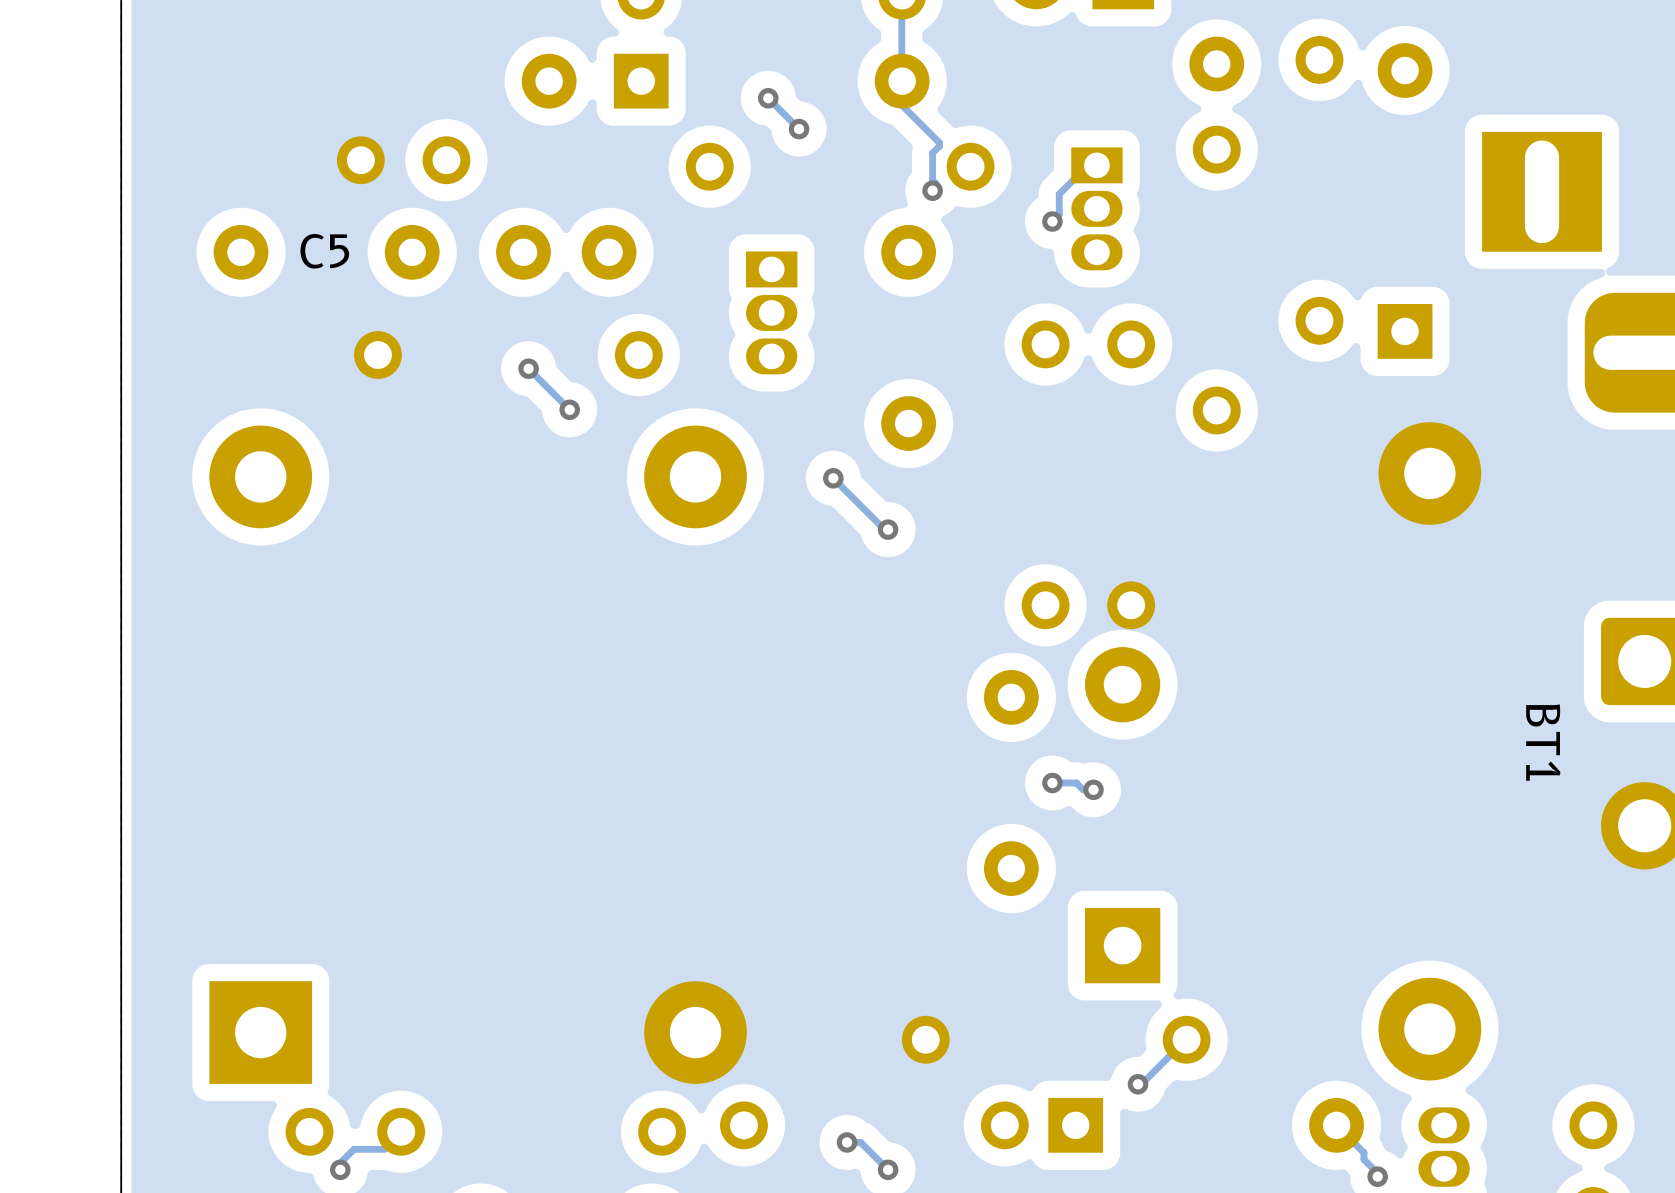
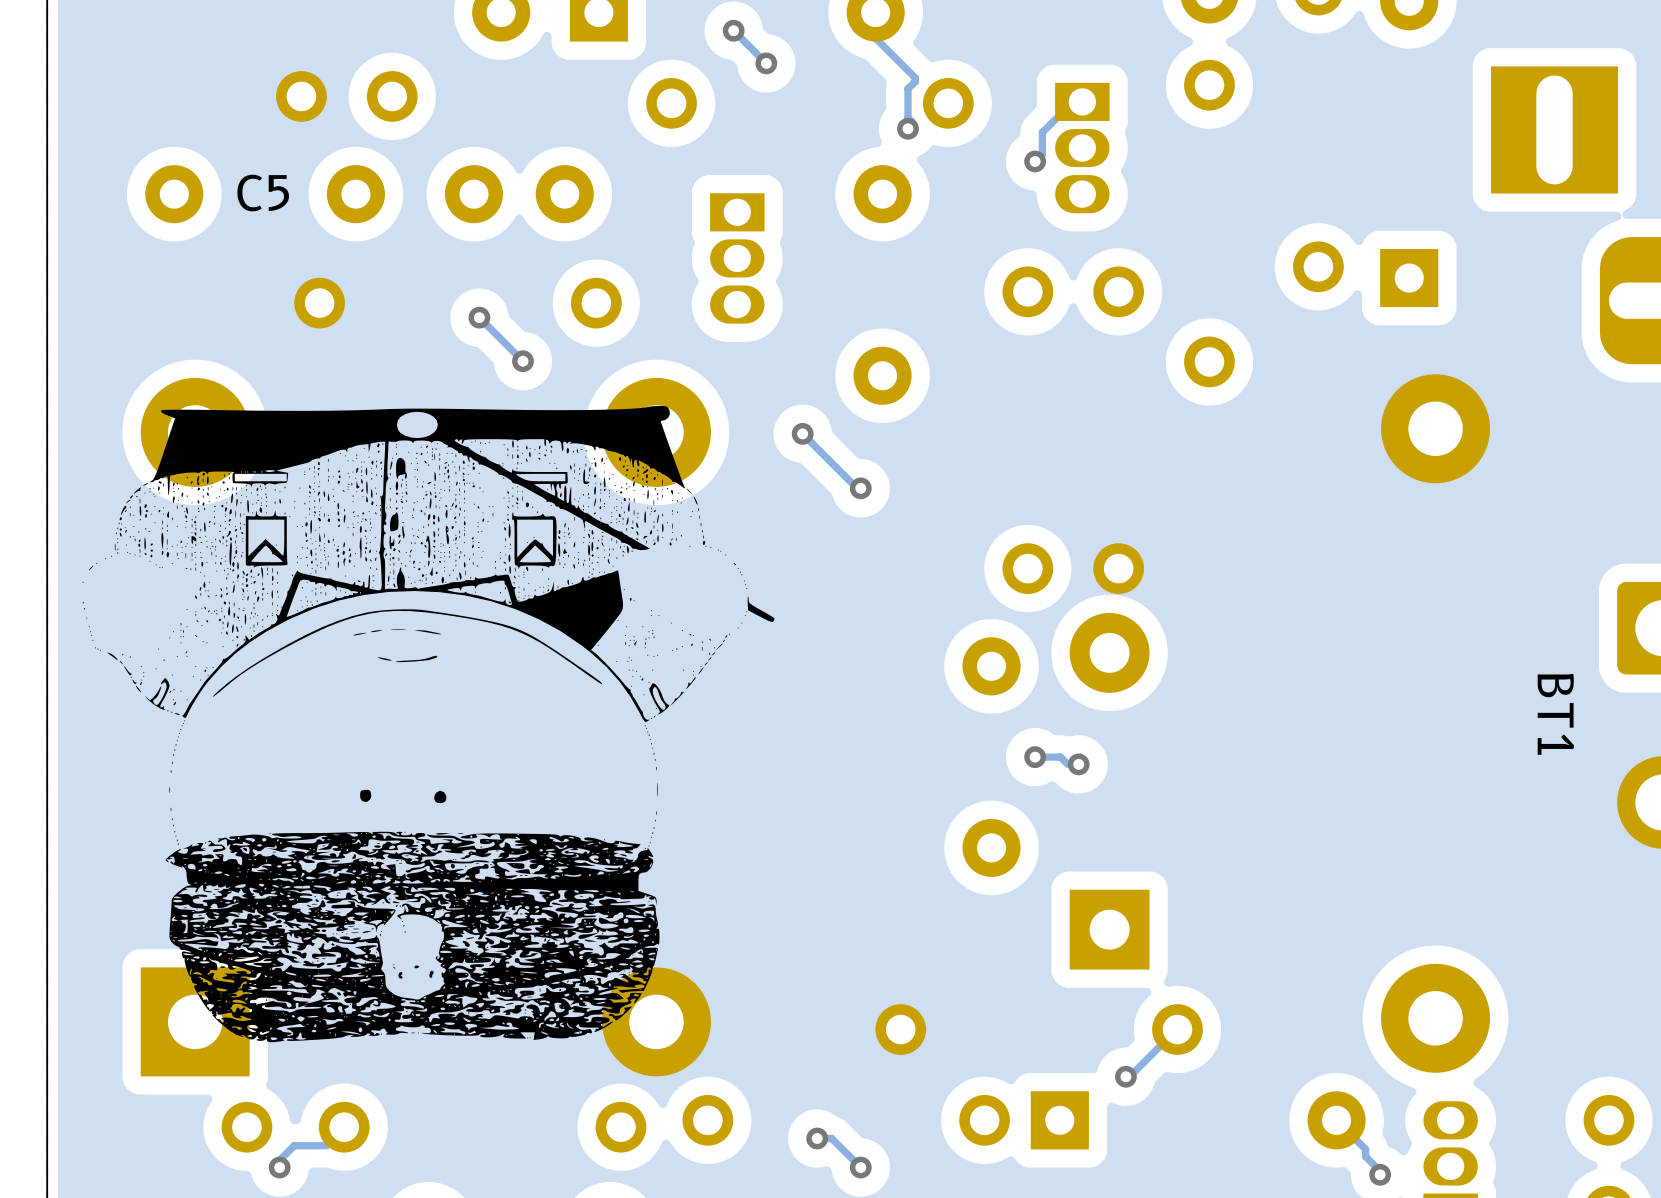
drawing: none -> [82, 405, 775, 1043]

